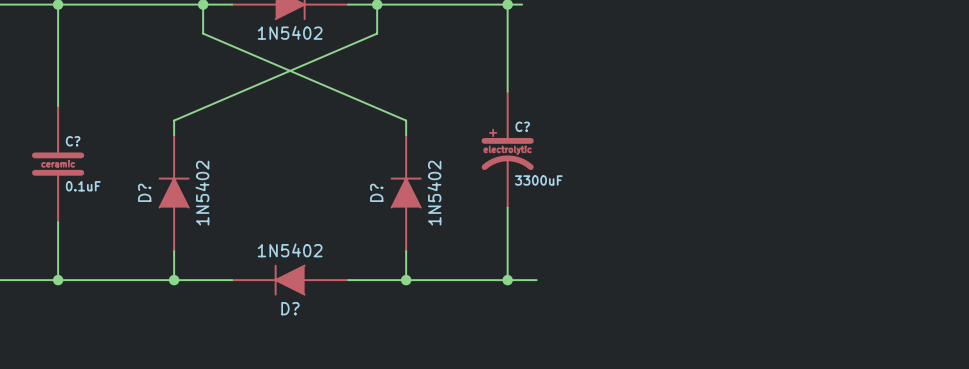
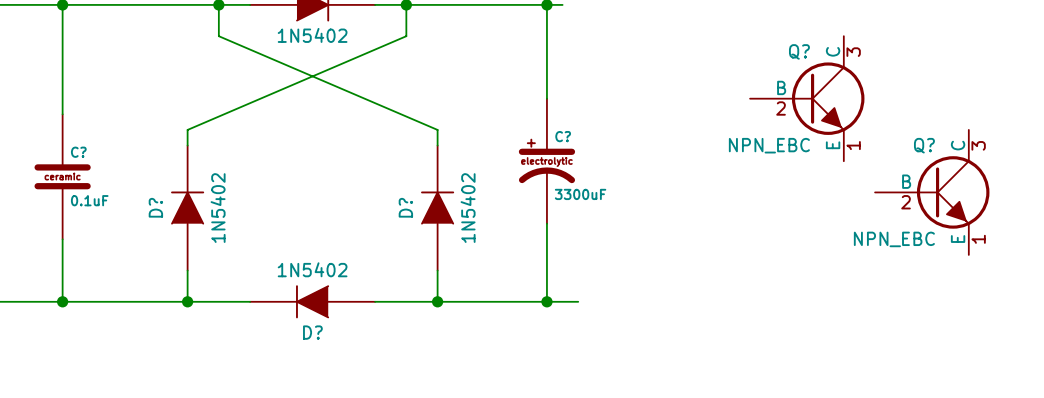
Q?: none -> NPN_EBC (807, 98)
Q?: none -> NPN_EBC (932, 192)

